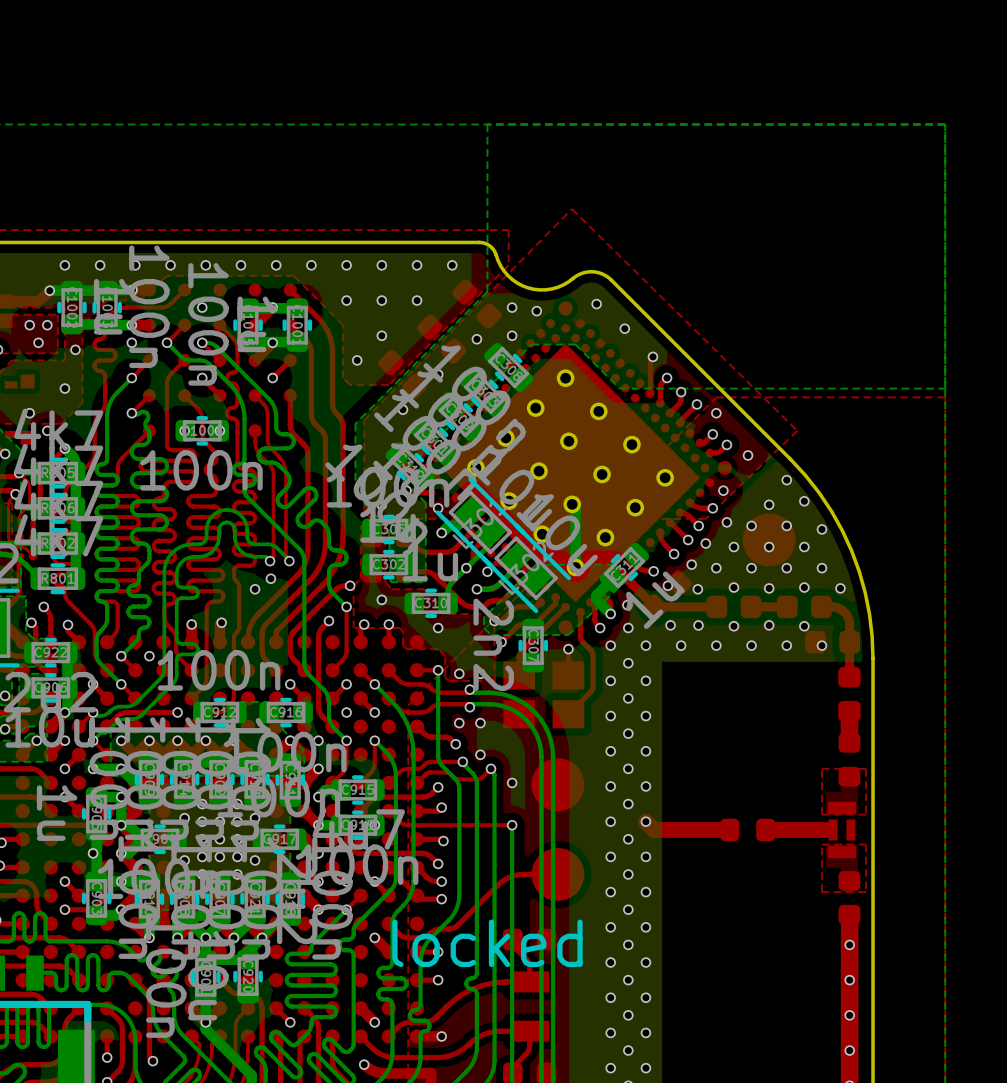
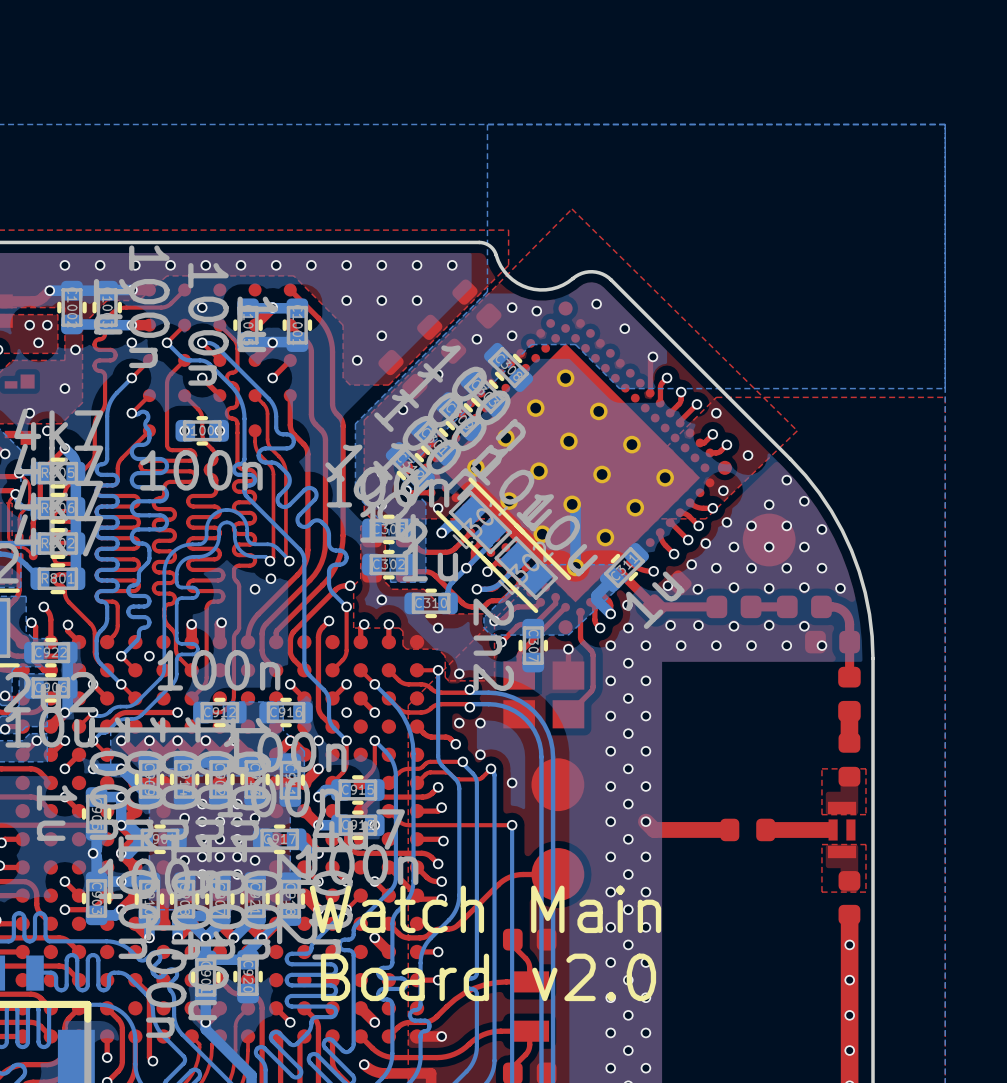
text: none -> Watch Main (485, 909)
text: locked (487, 943) -> none
text: none -> Board v2.0 (488, 977)

